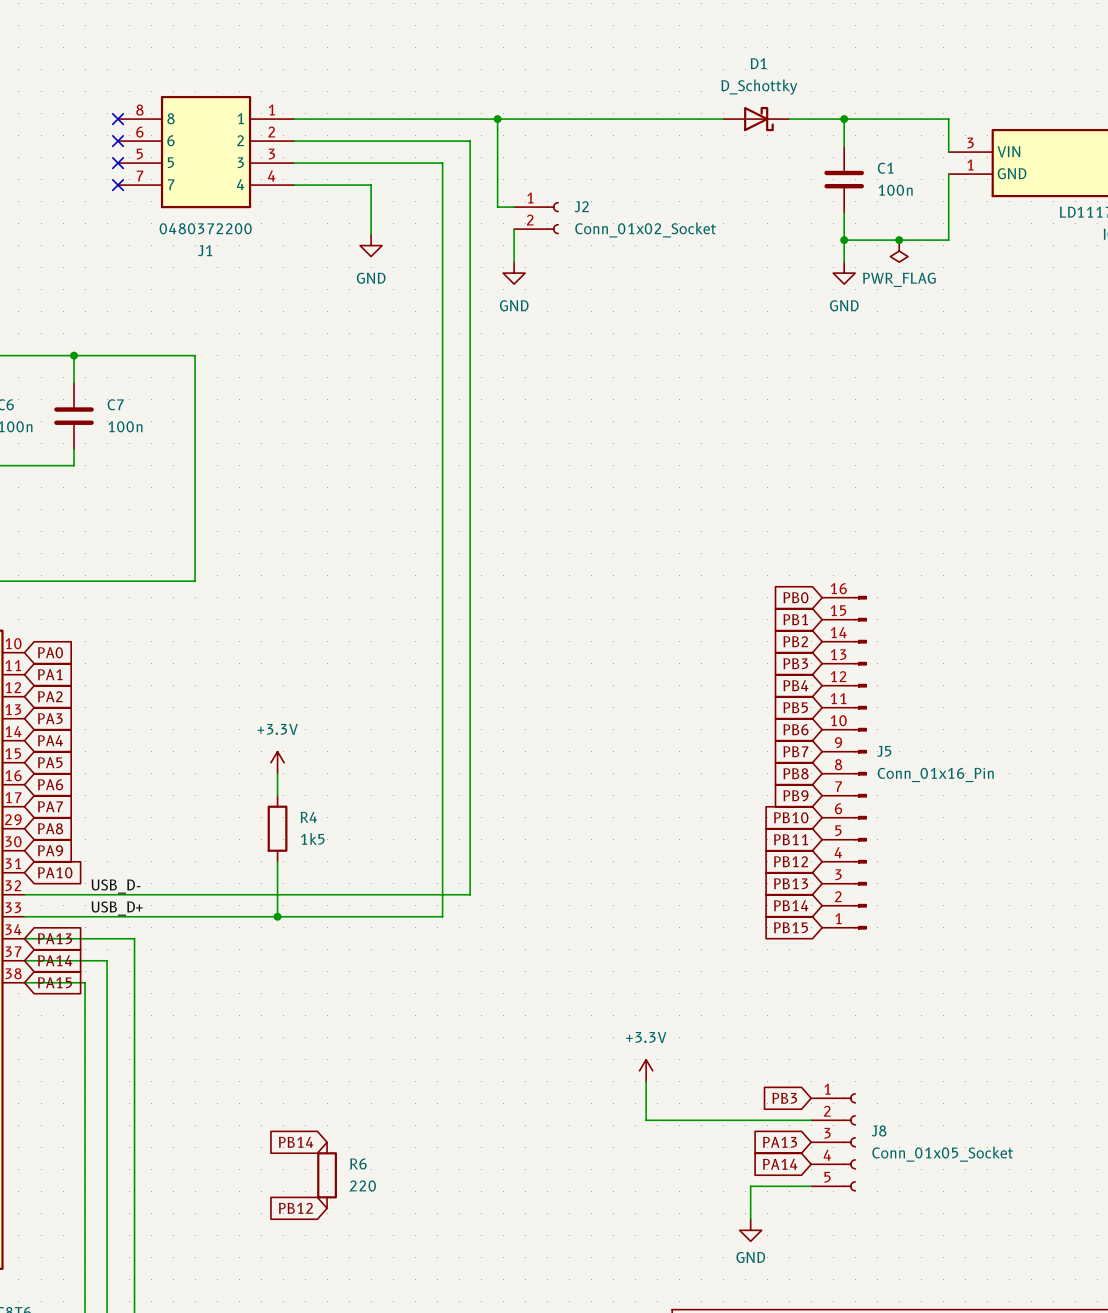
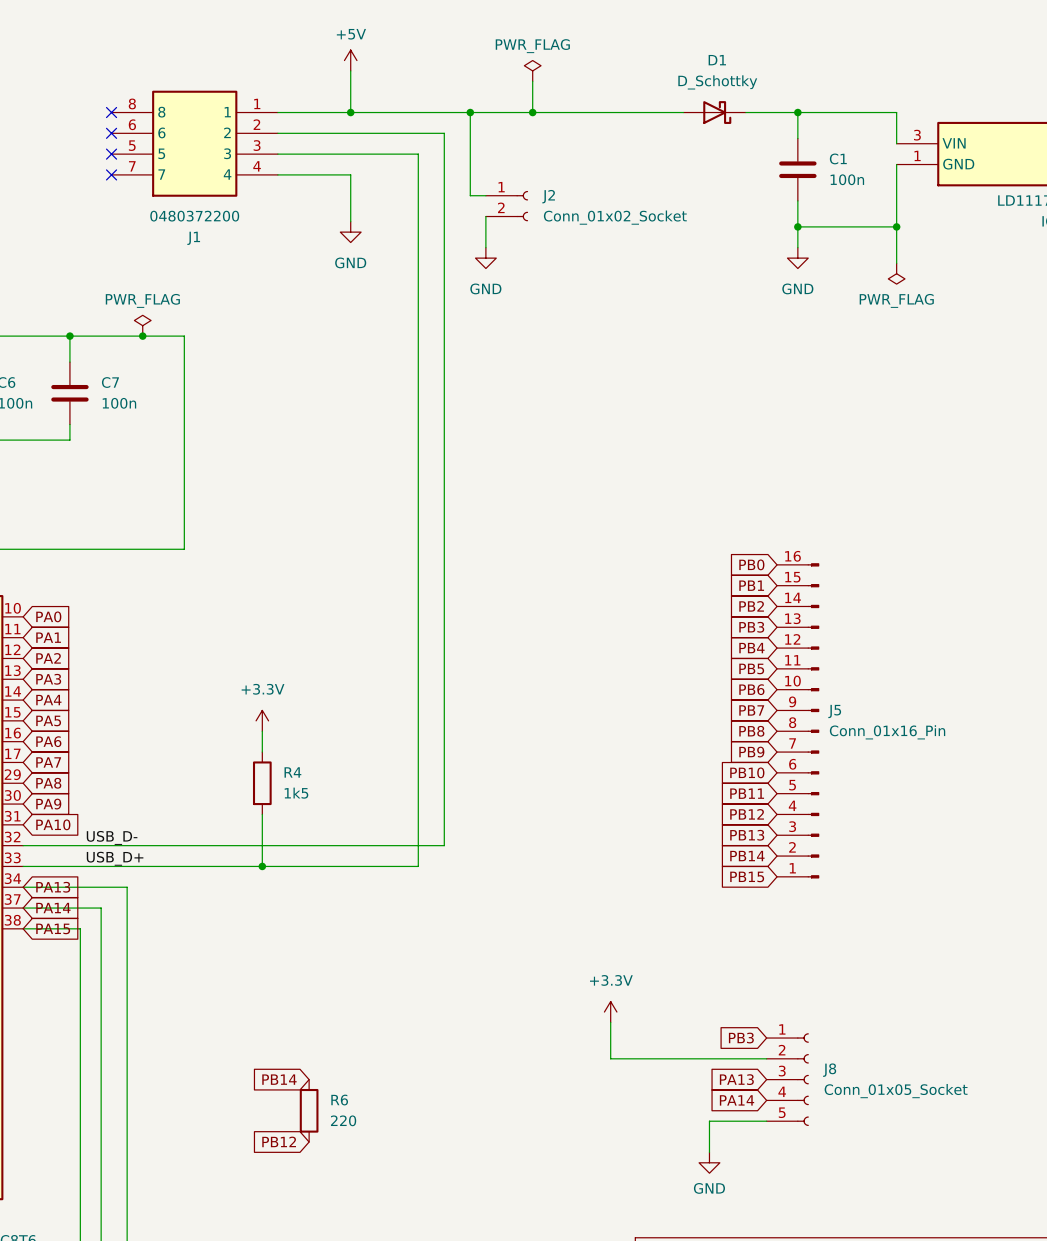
power symbol: none -> +5V (350, 60)
wire: none -> (350, 70) (350, 112)
power symbol: none -> PWR_FLAG (532, 70)
wire: none -> (532, 81) (532, 112)
junction: none -> (350, 112)
junction: none -> (532, 112)
junction position: (899, 240) -> (896, 226)
wire: none -> (896, 226) (896, 263)
power symbol position: PWR_FLAG (899, 251) -> PWR_FLAG (896, 273)
power symbol: none -> PWR_FLAG (142, 325)
junction: none -> (142, 336)

